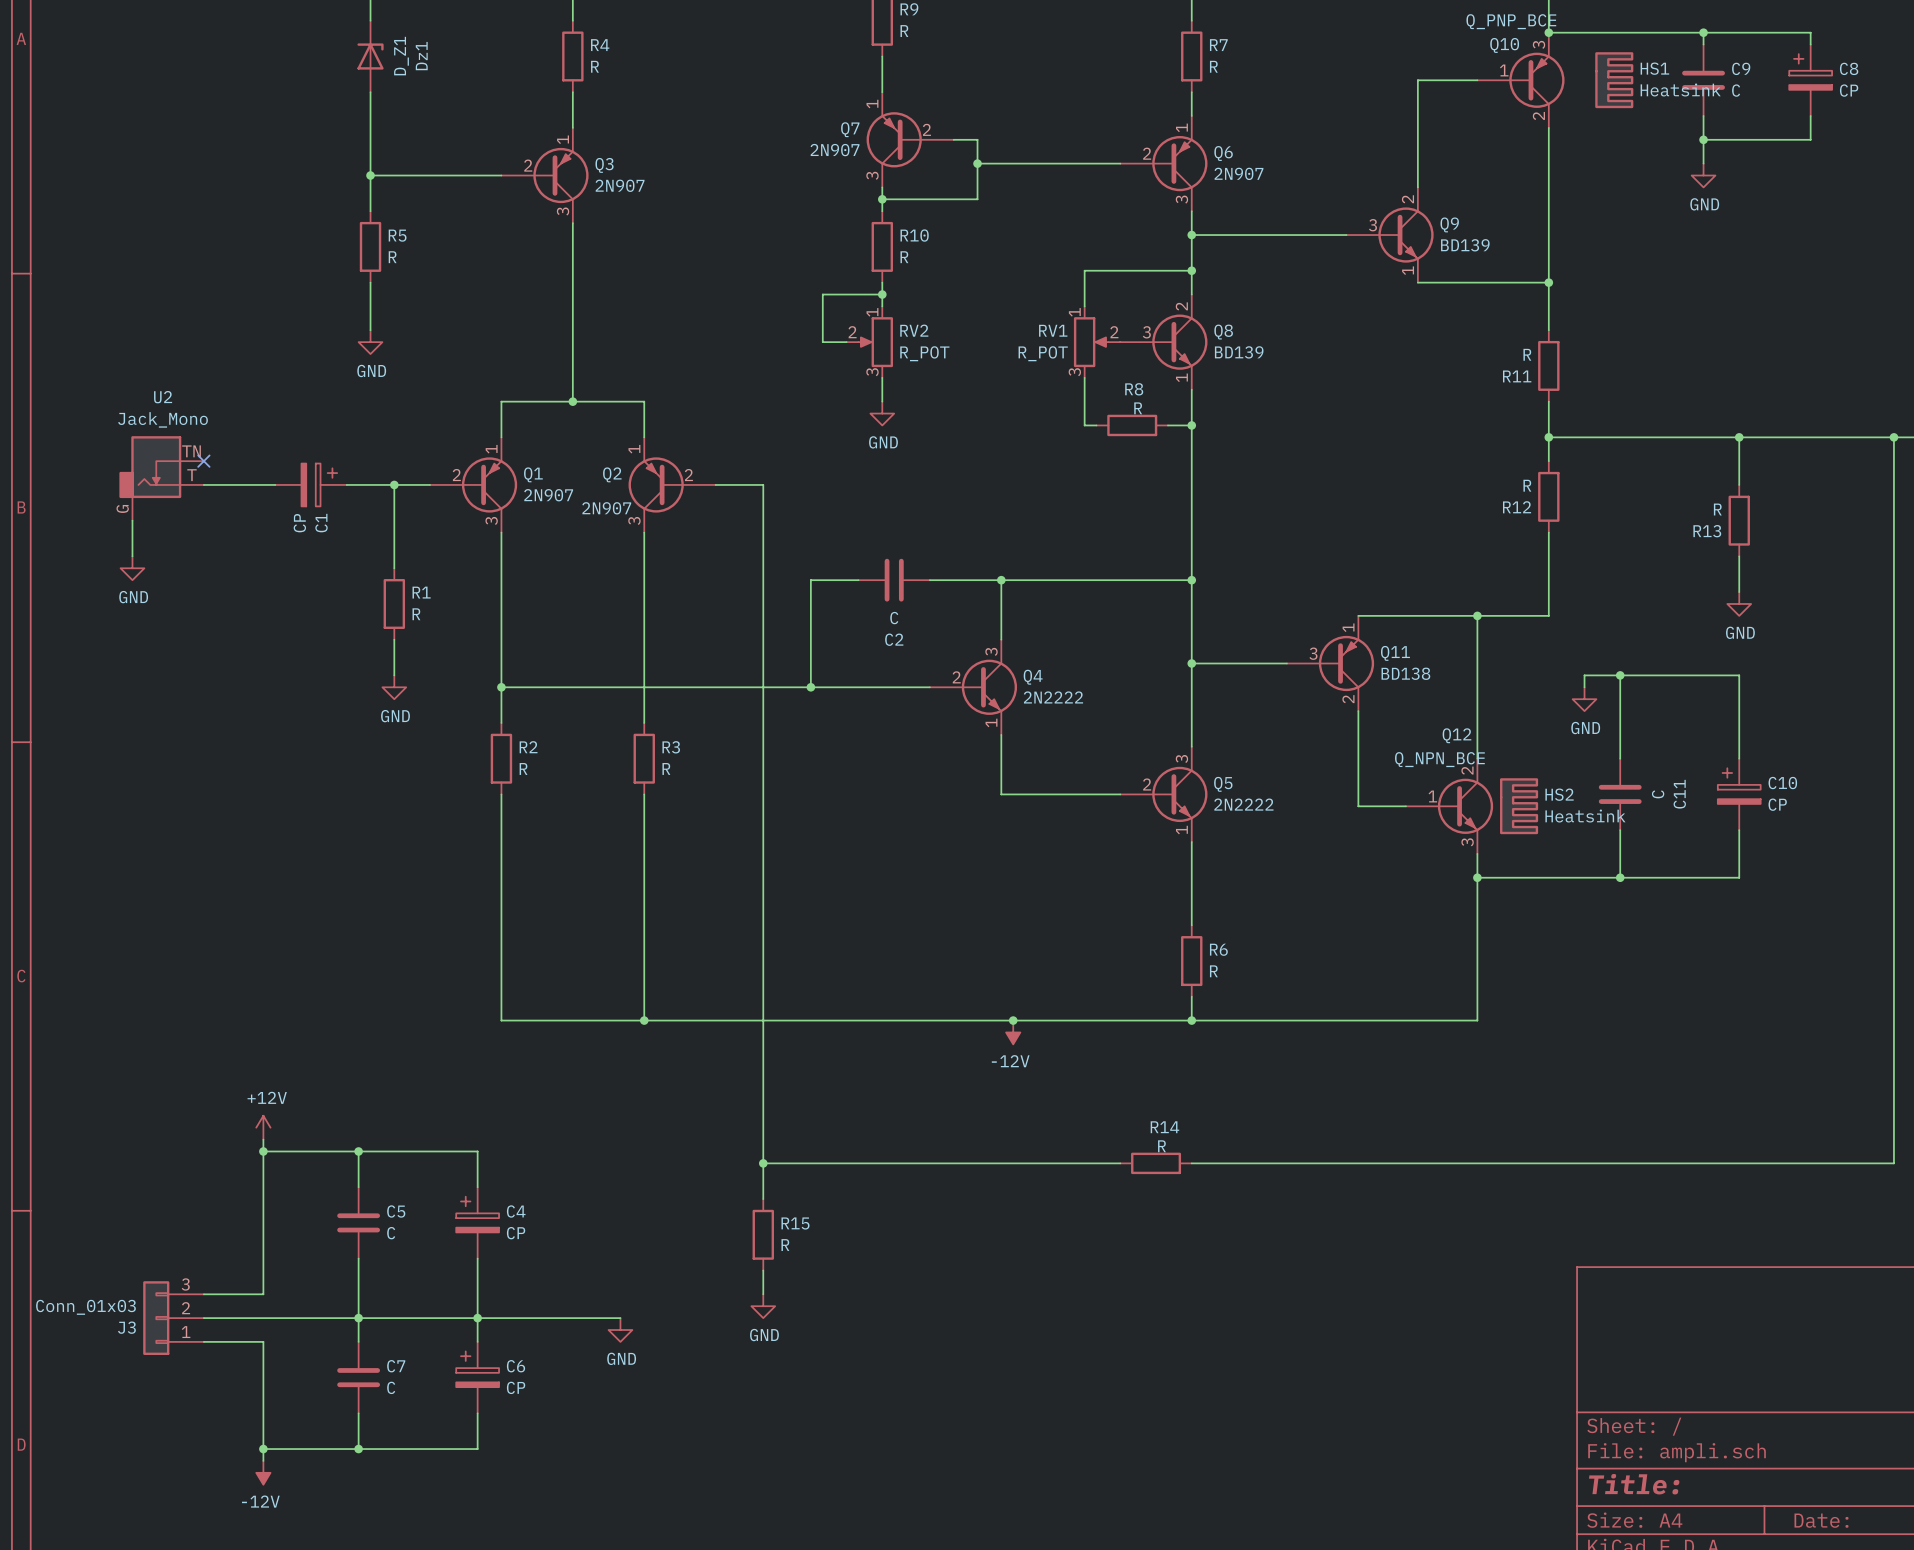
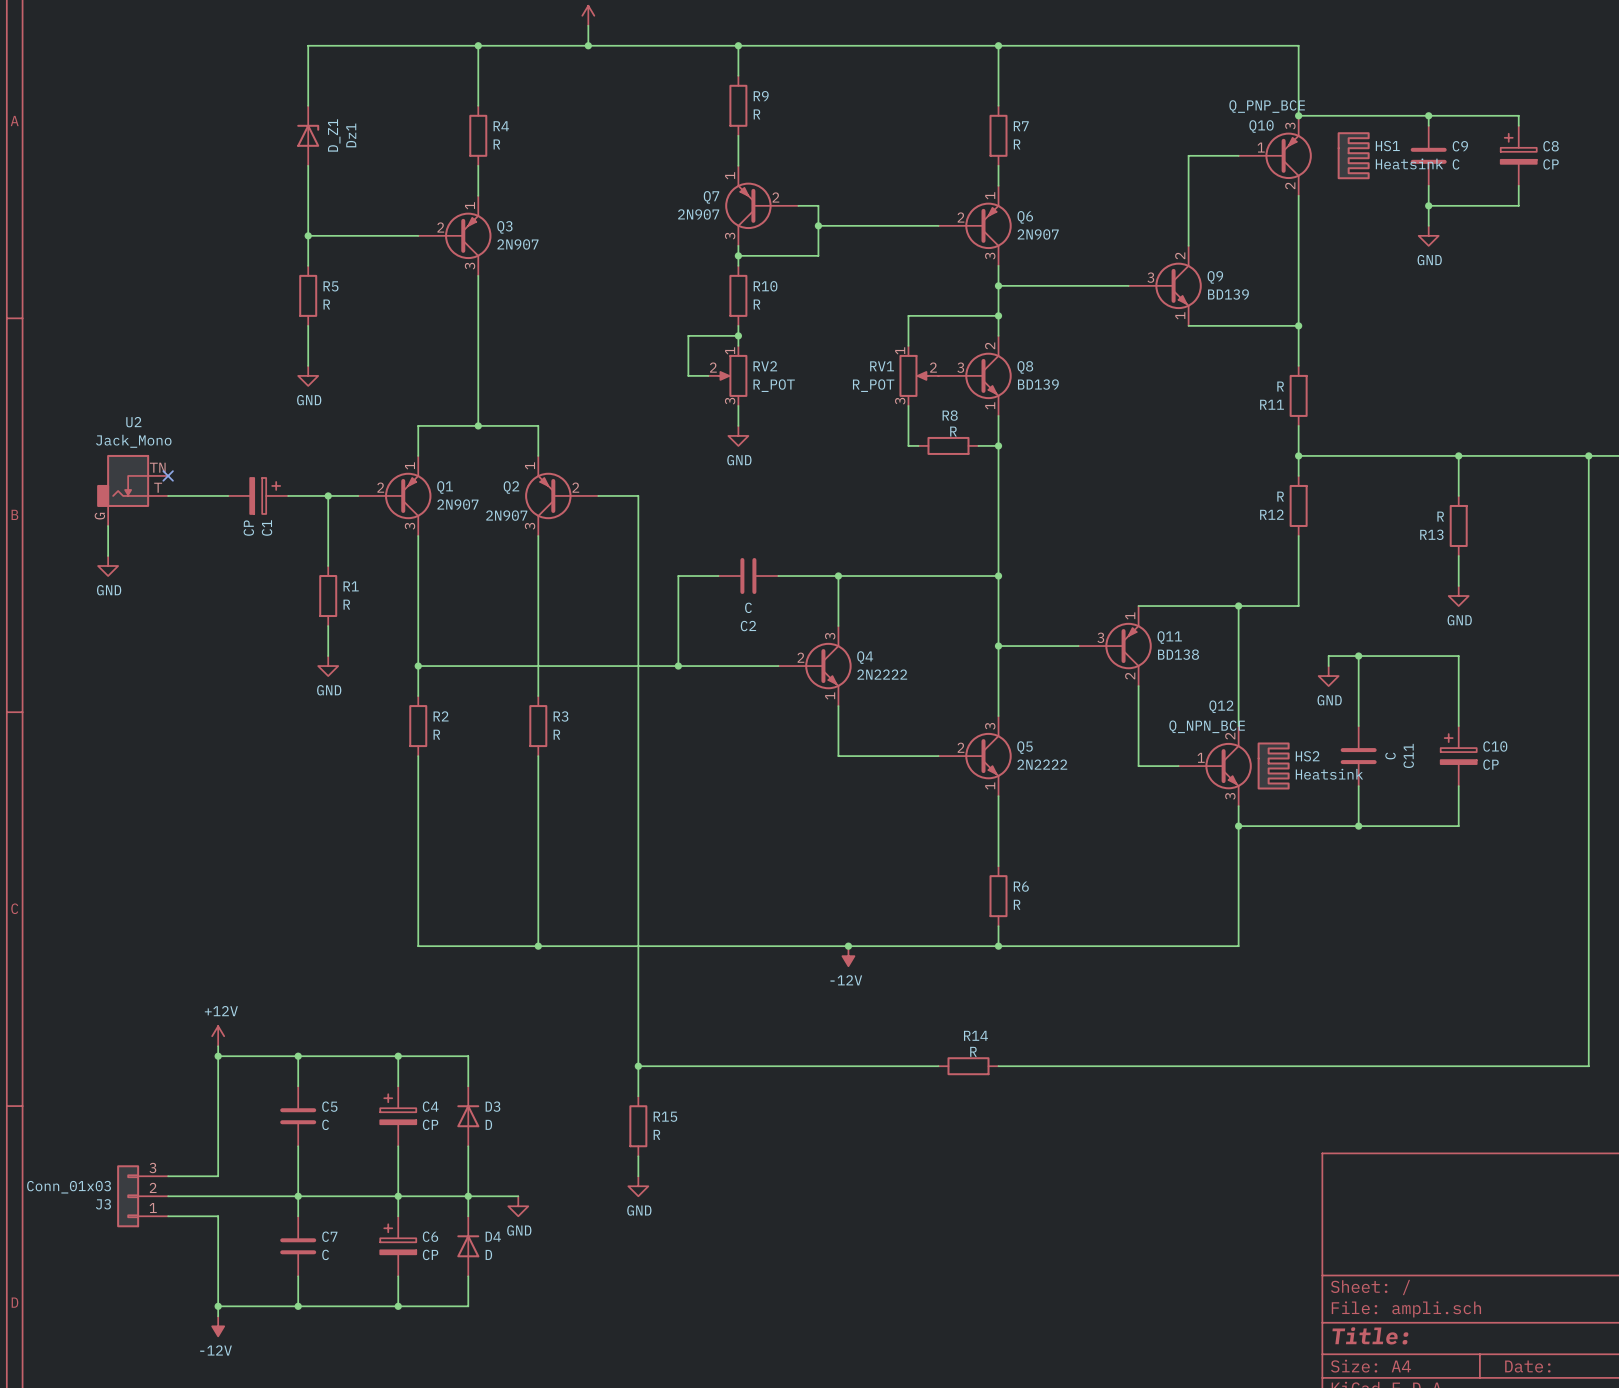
wire: none -> (398, 1056) (468, 1056) (468, 1086)
junction: none -> (398, 1056)
D3: none -> D (468, 1116)
wire: none -> (468, 1146) (468, 1216)
junction: none -> (468, 1196)
D4: none -> D (468, 1246)
wire: none -> (468, 1276) (468, 1306) (398, 1306)
junction: none -> (398, 1306)

